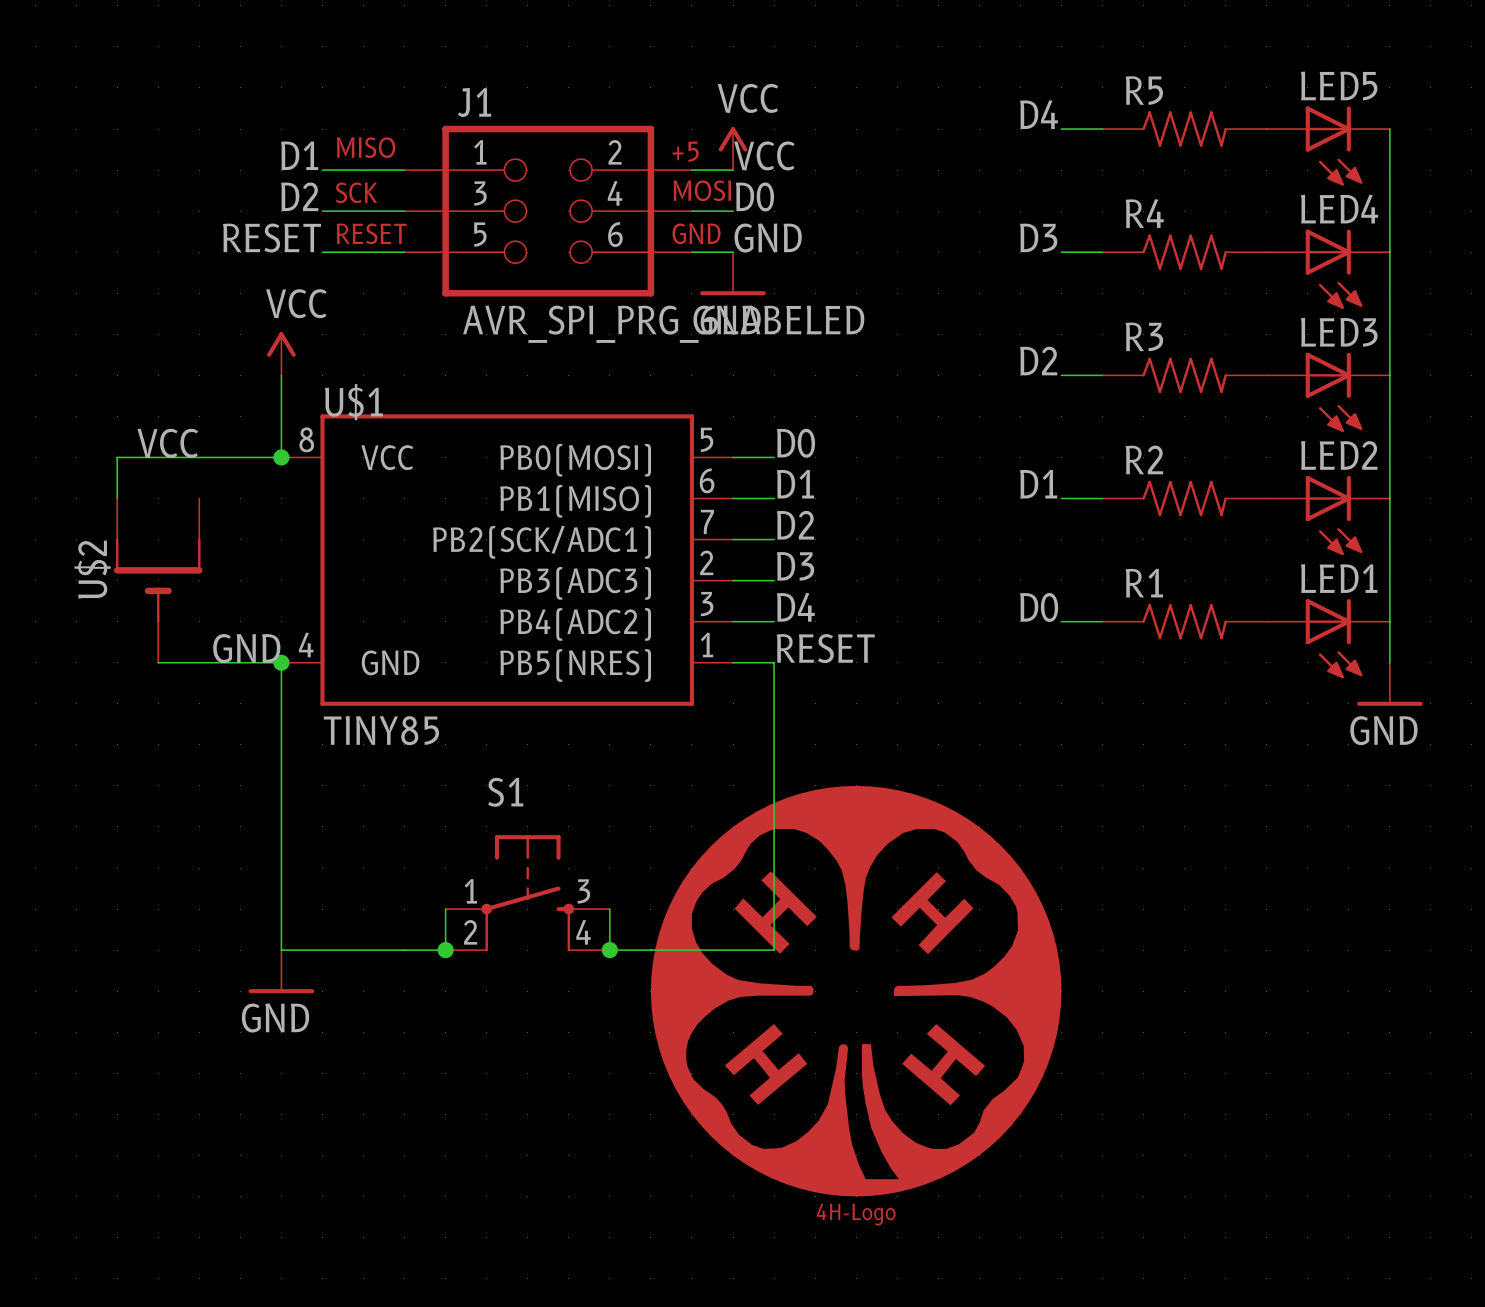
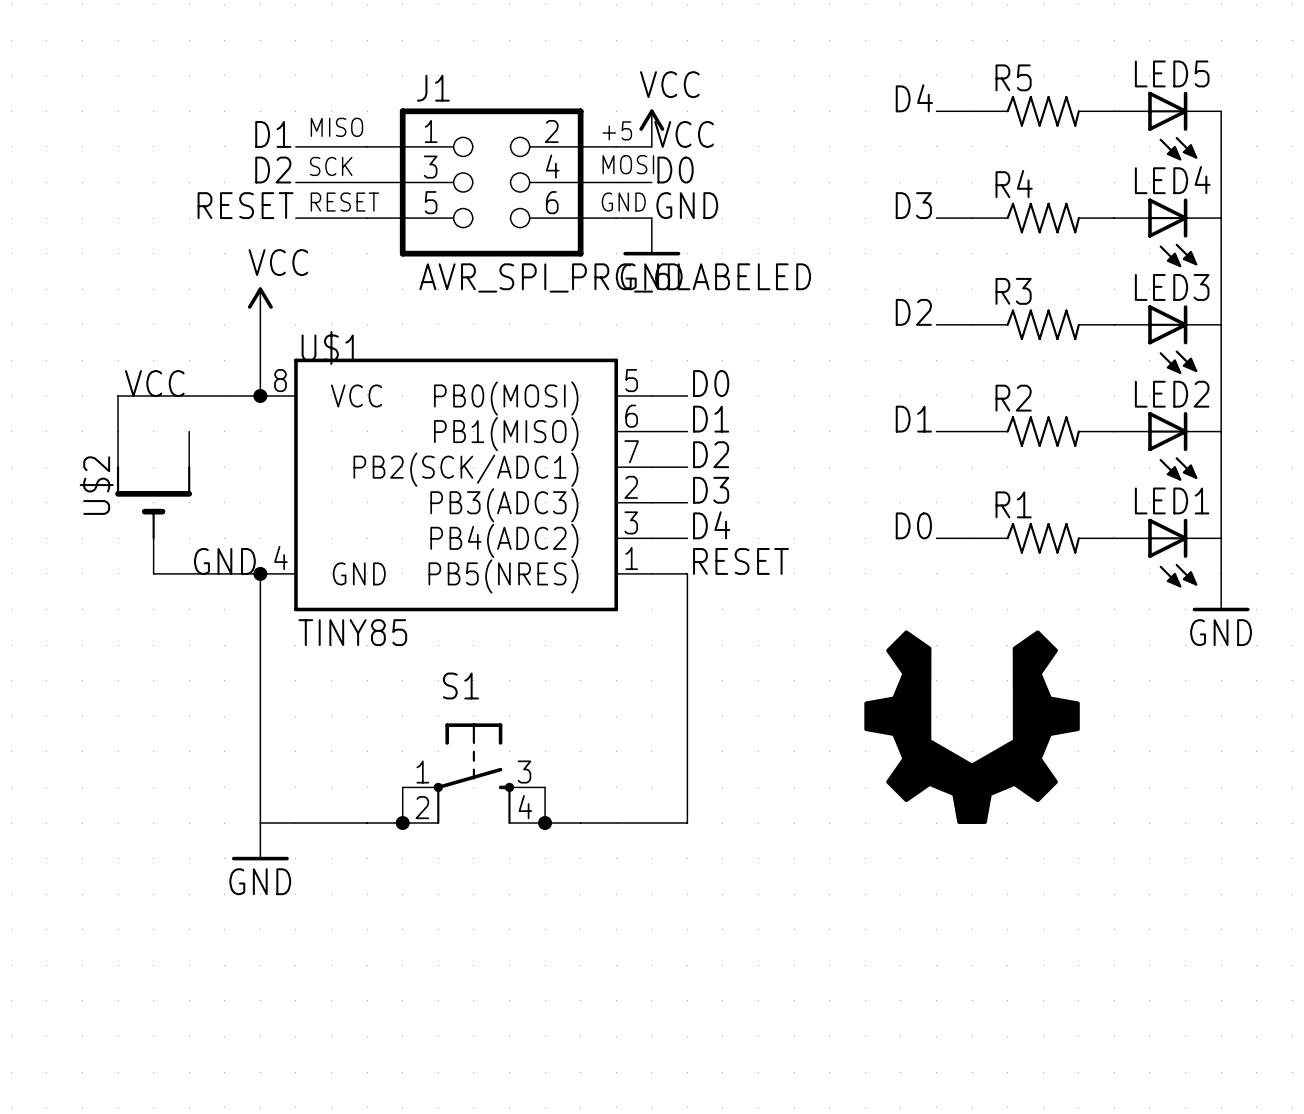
part: none -> (972, 727)
part: (856, 991) -> none

